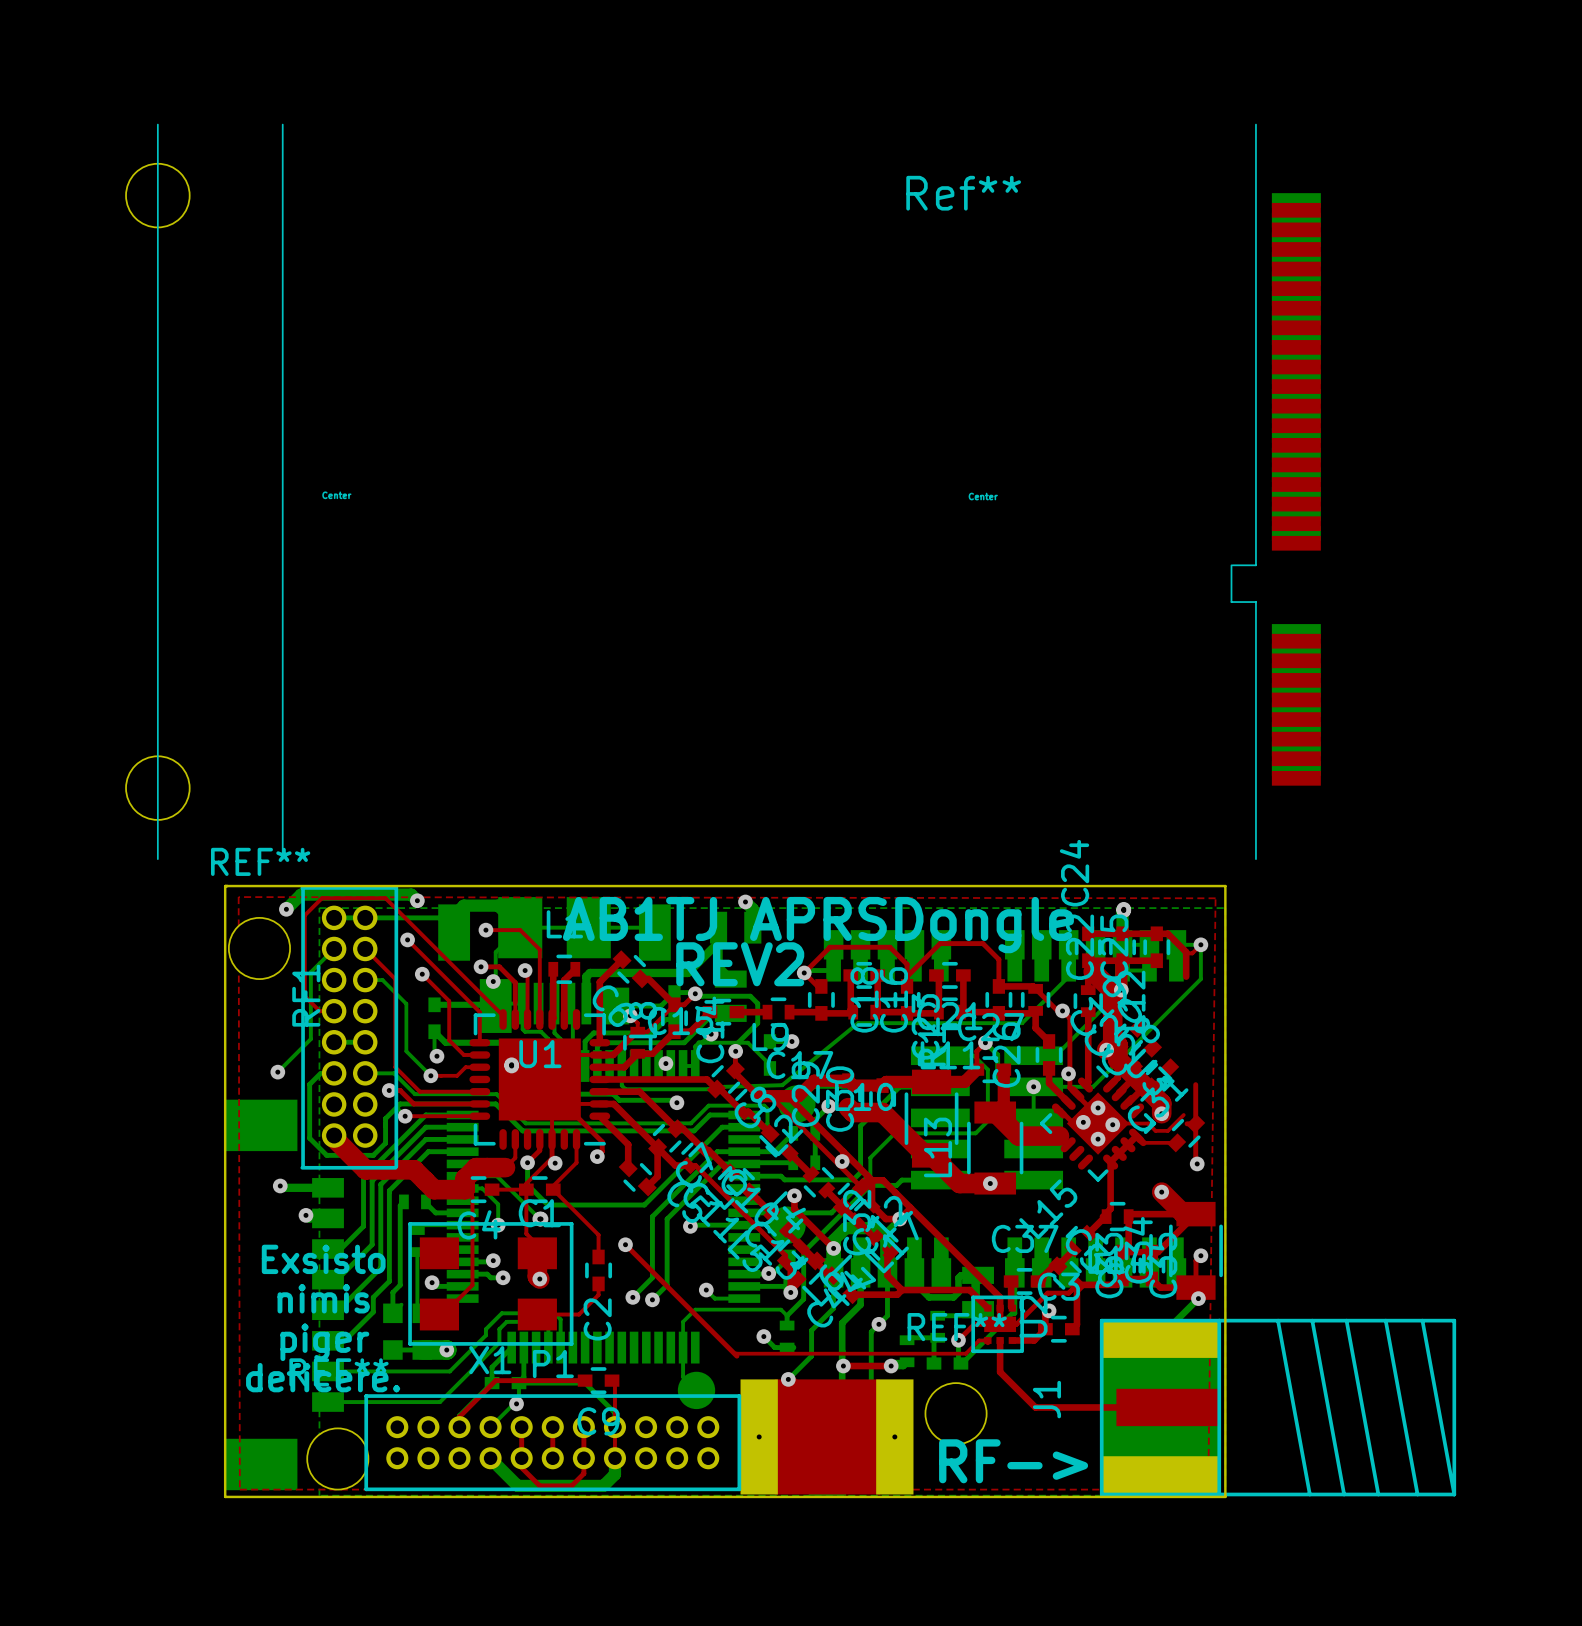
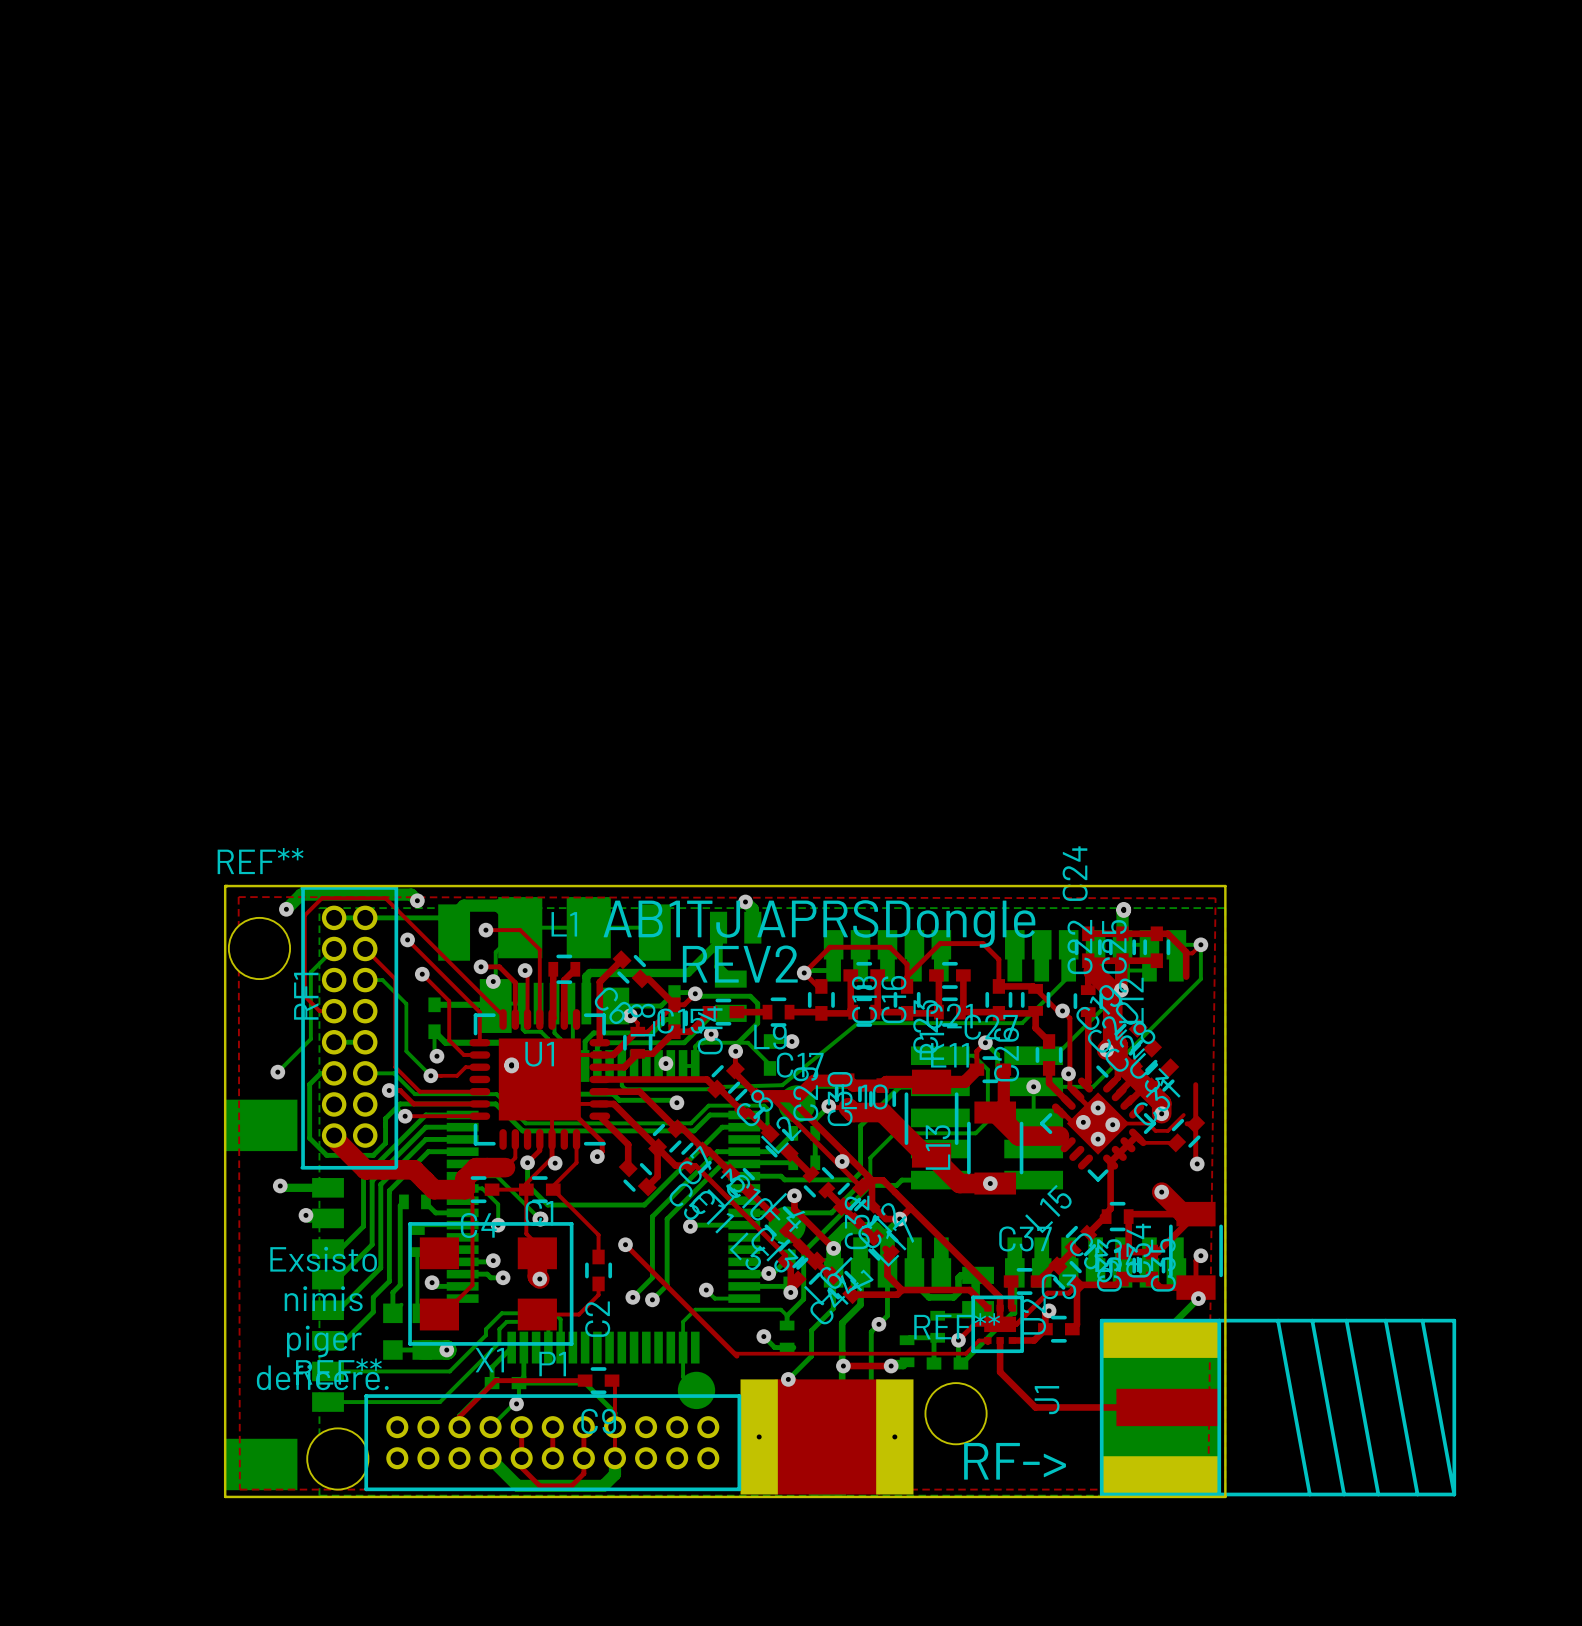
Ref**: (723, 491) -> none

